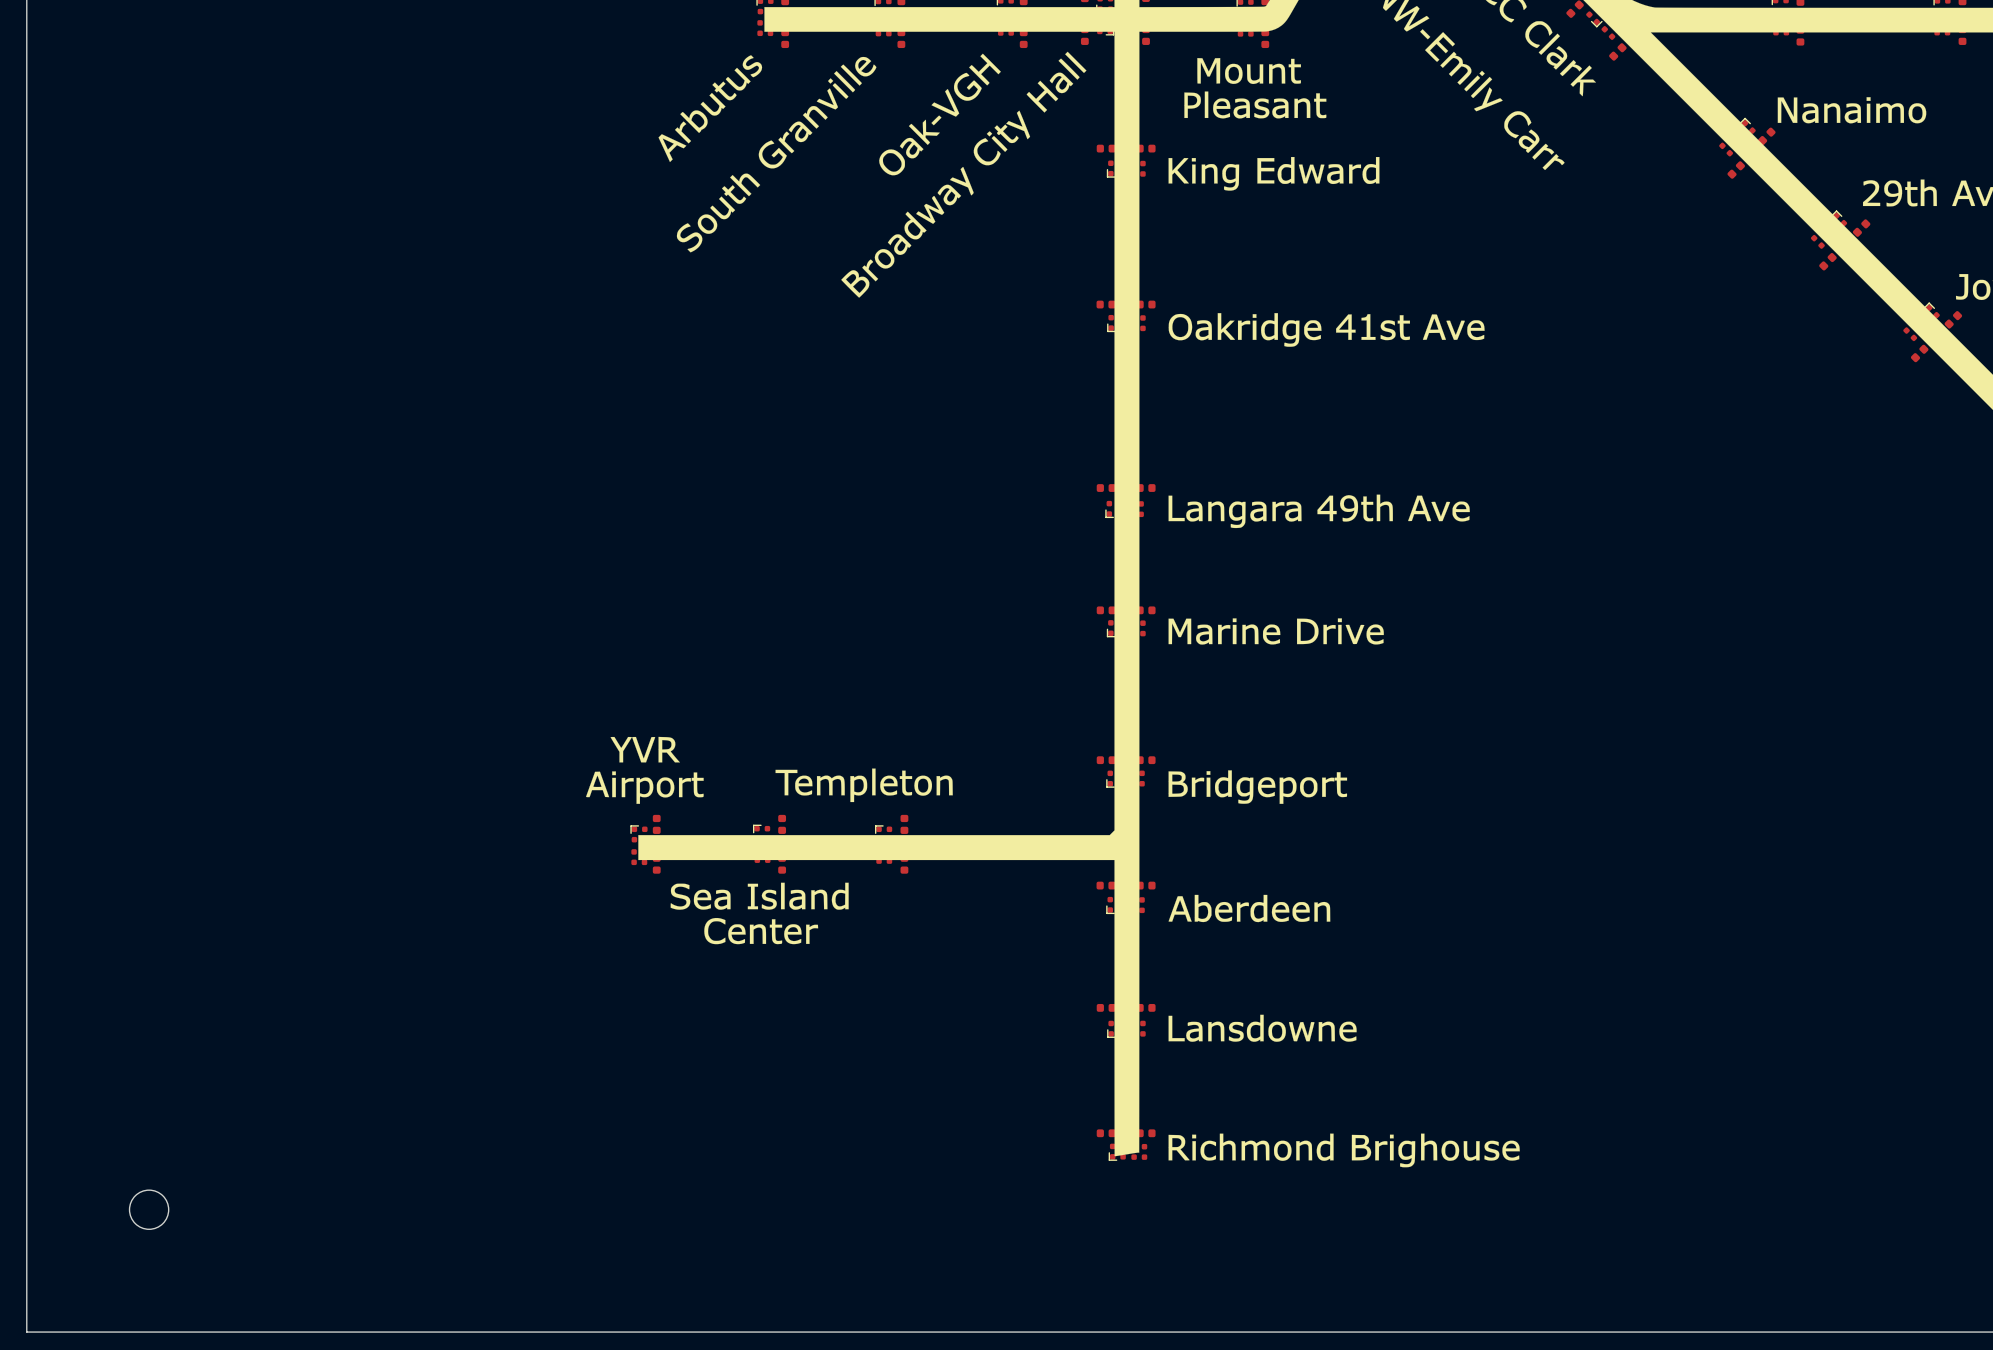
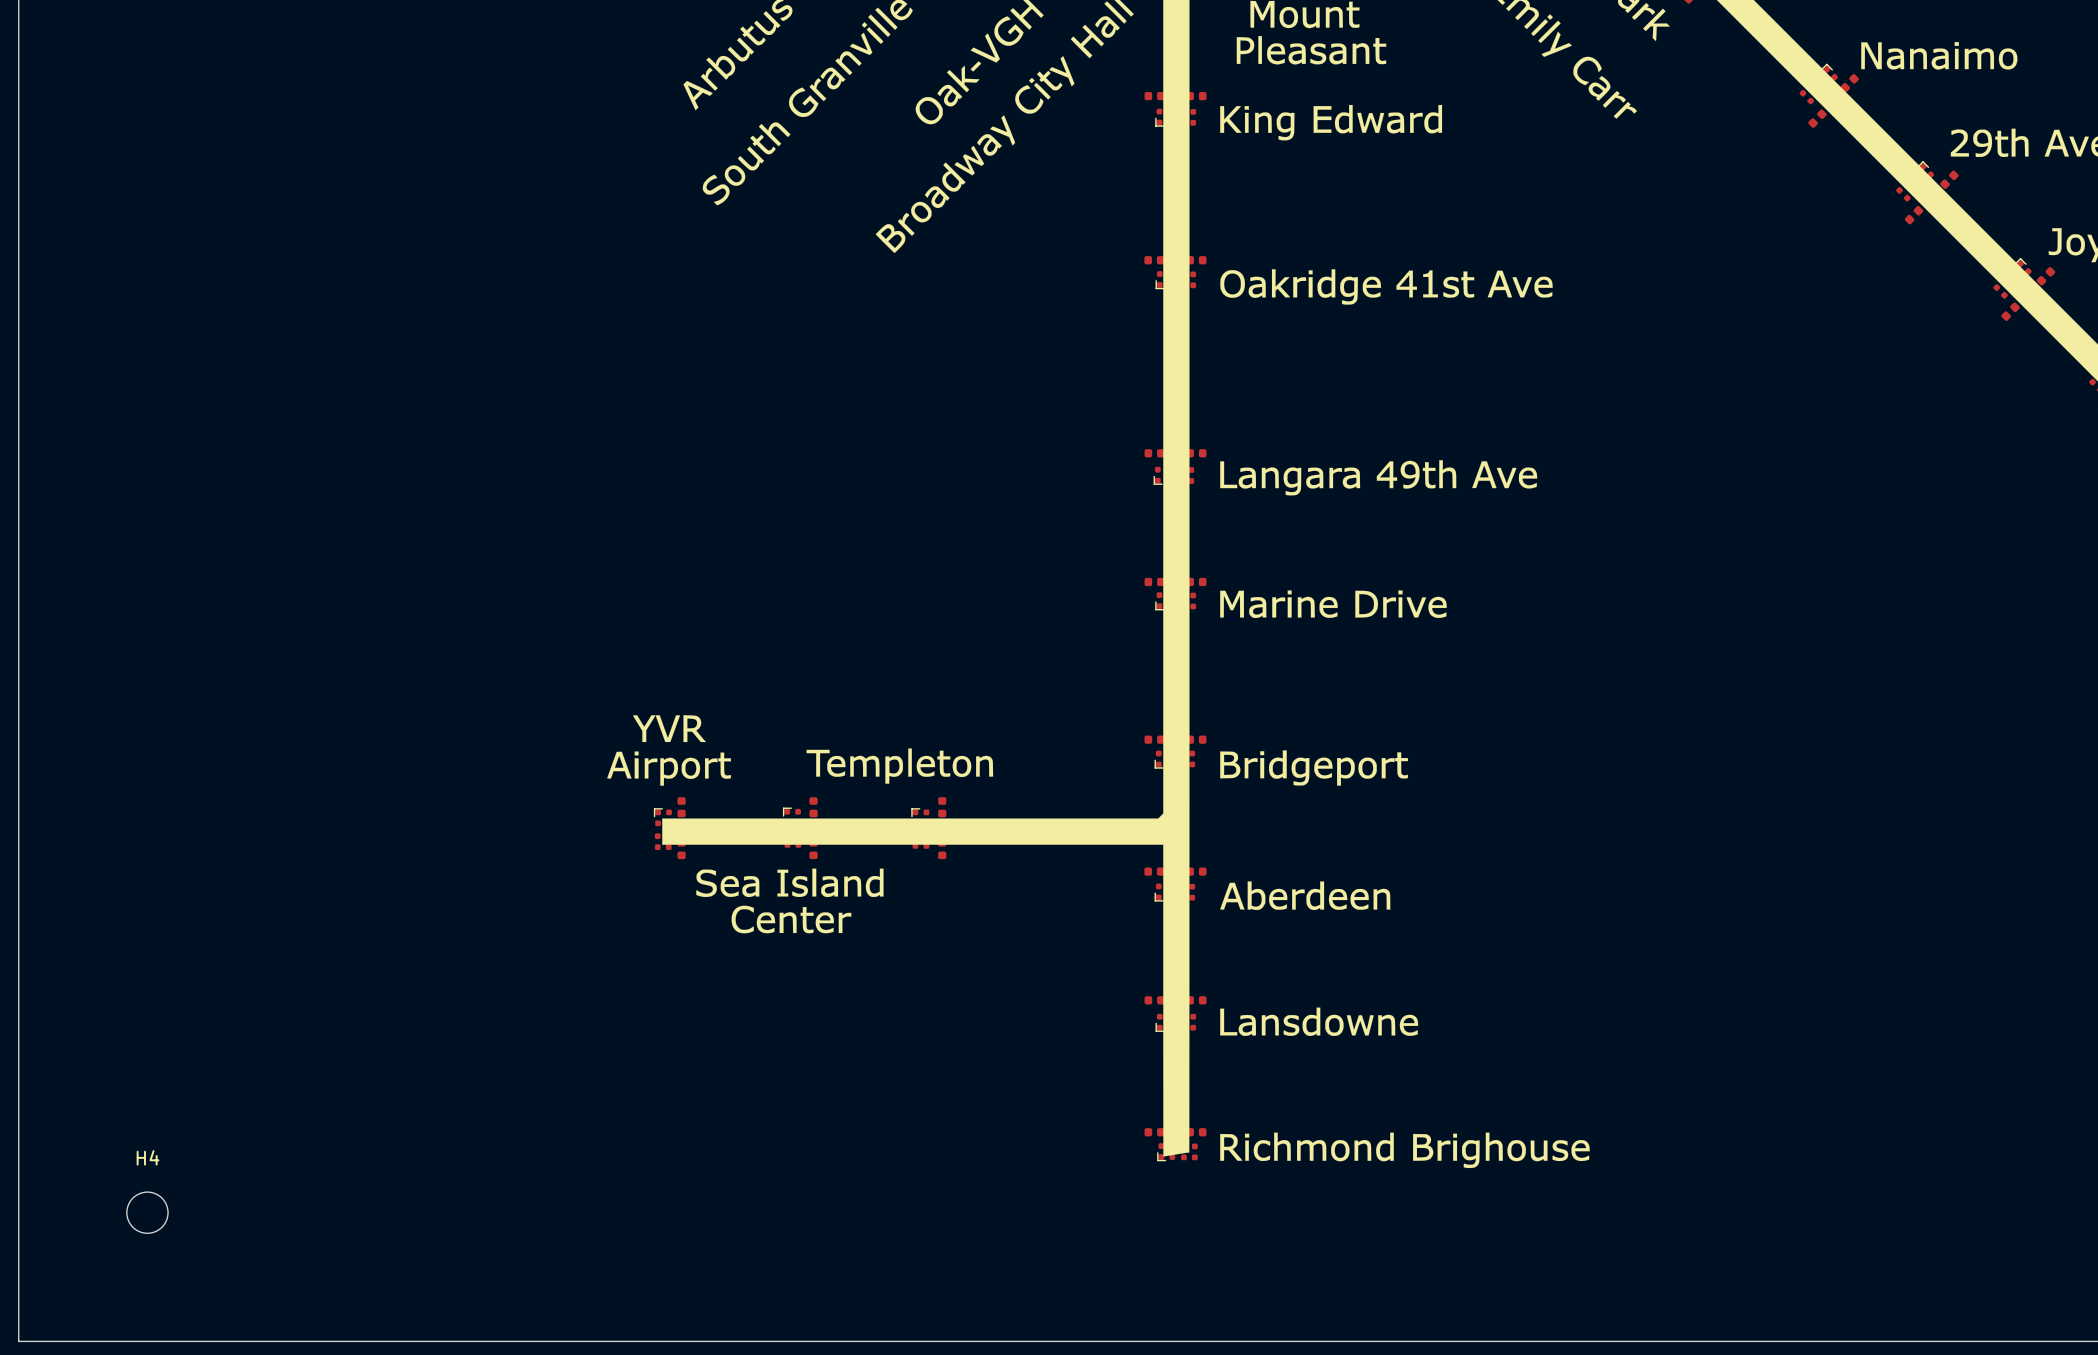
H4 name: none -> H4 (148, 1157)

